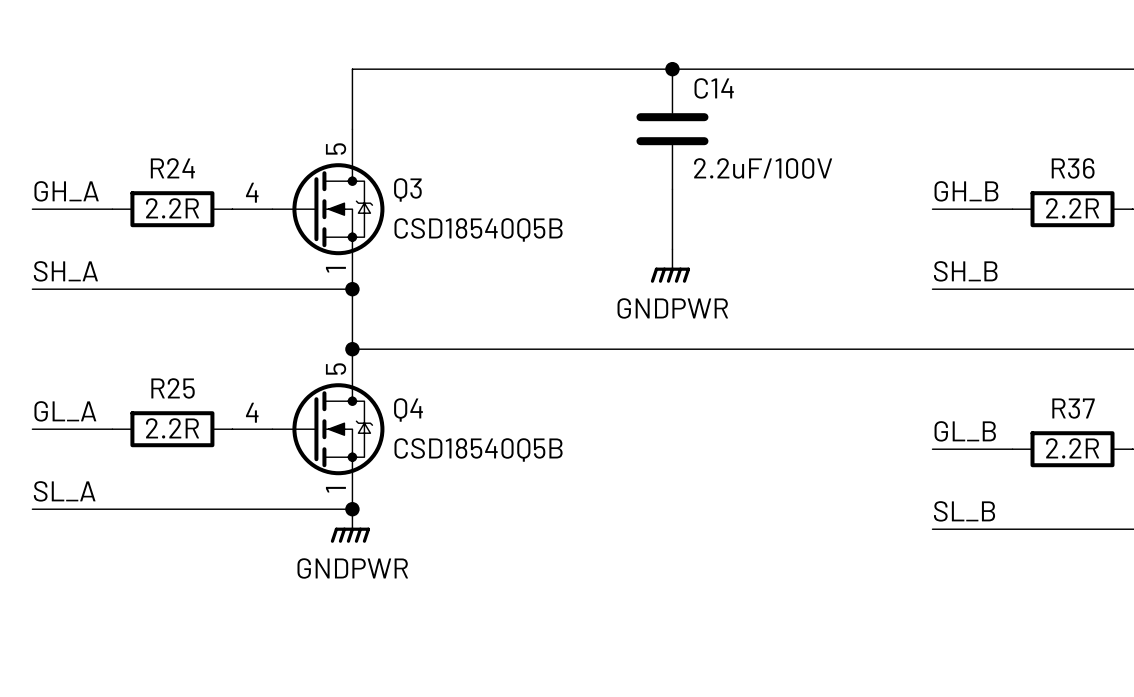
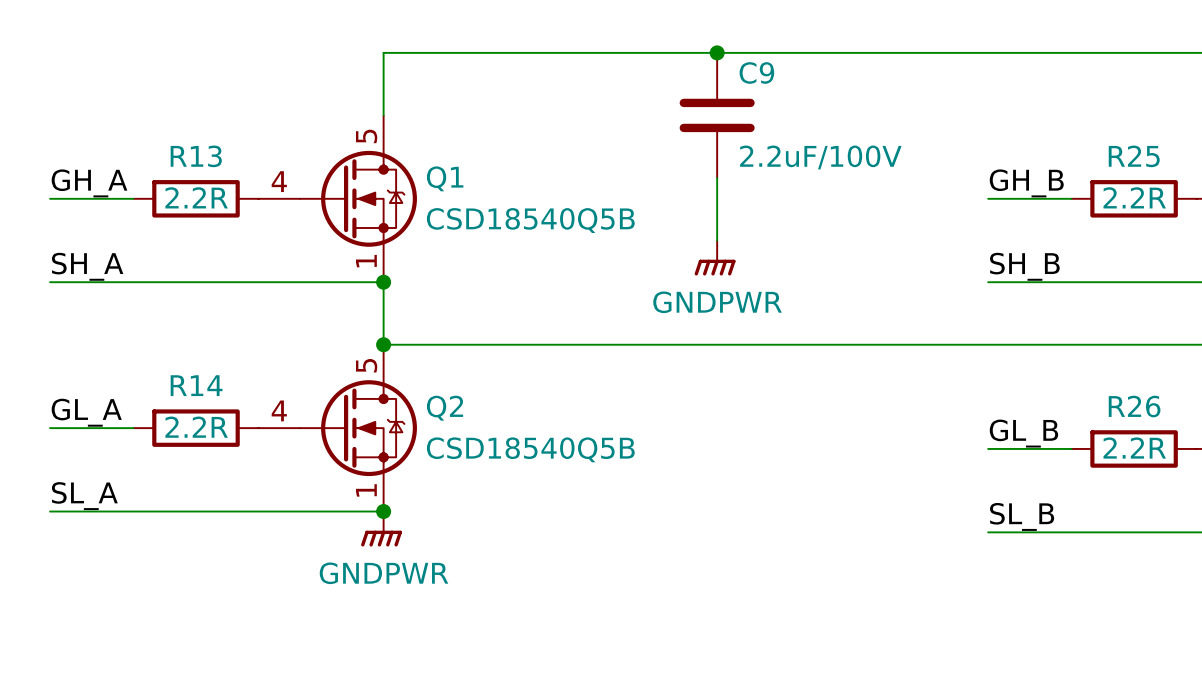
C14 name: C14 (714, 88) -> C9 (756, 72)
R24 name: R24 (172, 168) -> R13 (196, 156)
R36 name: R36 (1073, 168) -> R25 (1134, 156)
Q3 name: Q3 (407, 189) -> Q1 (445, 178)
R25 name: R25 (173, 388) -> R14 (196, 385)
R37 name: R37 (1073, 408) -> R26 (1134, 406)
Q4 name: Q4 (408, 409) -> Q2 (445, 408)

